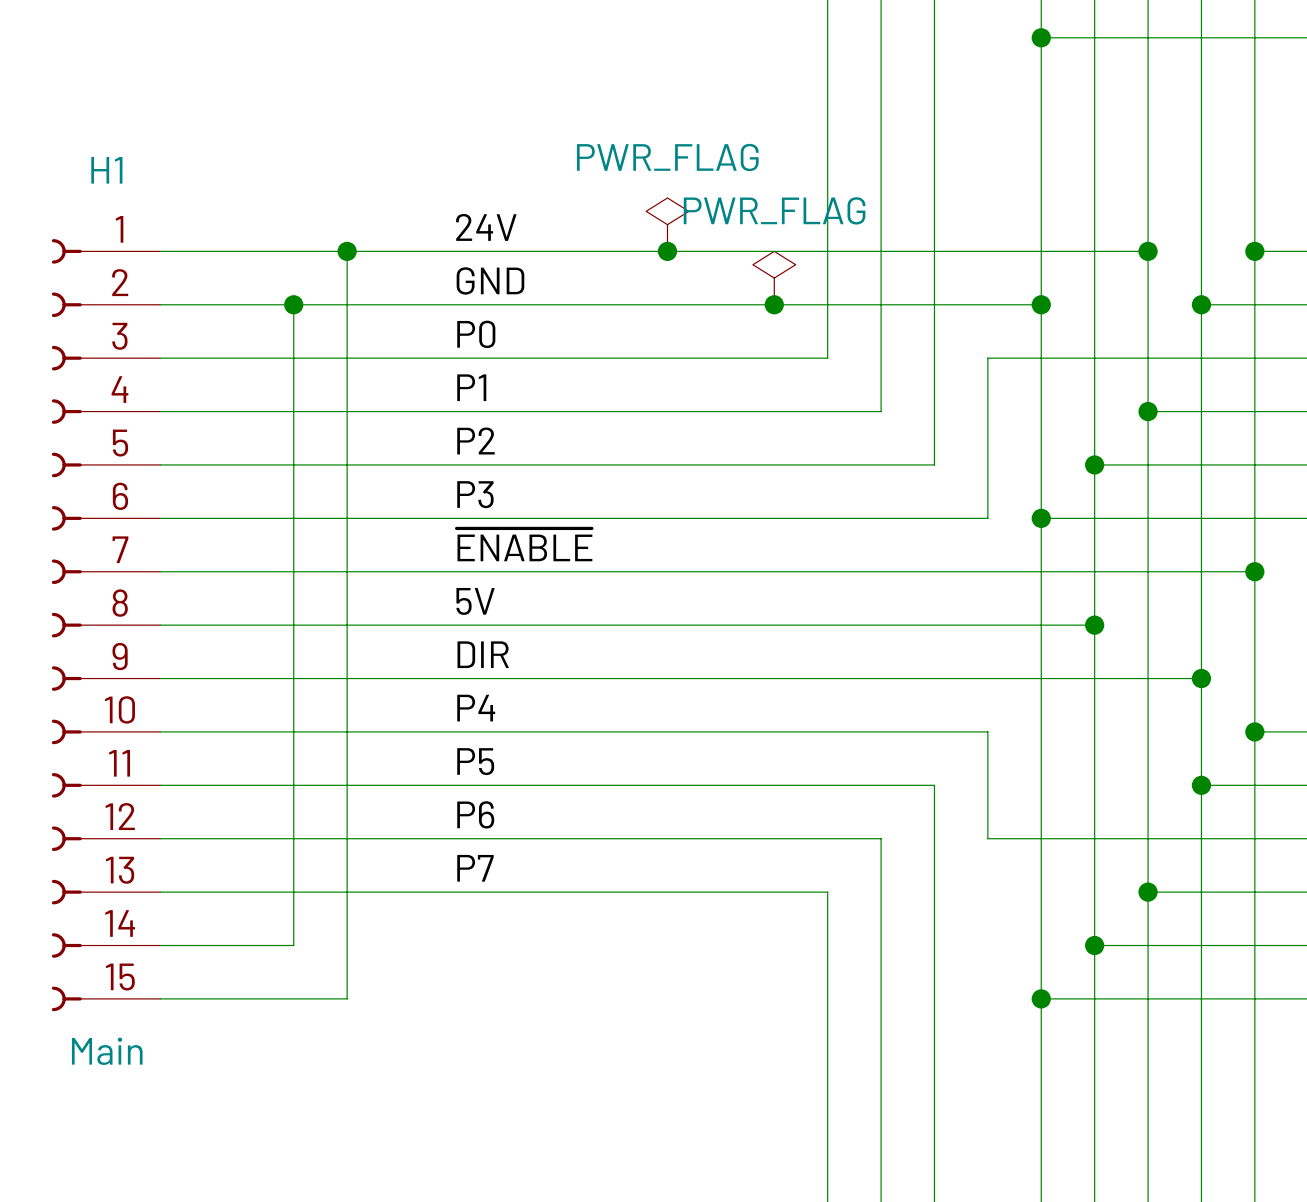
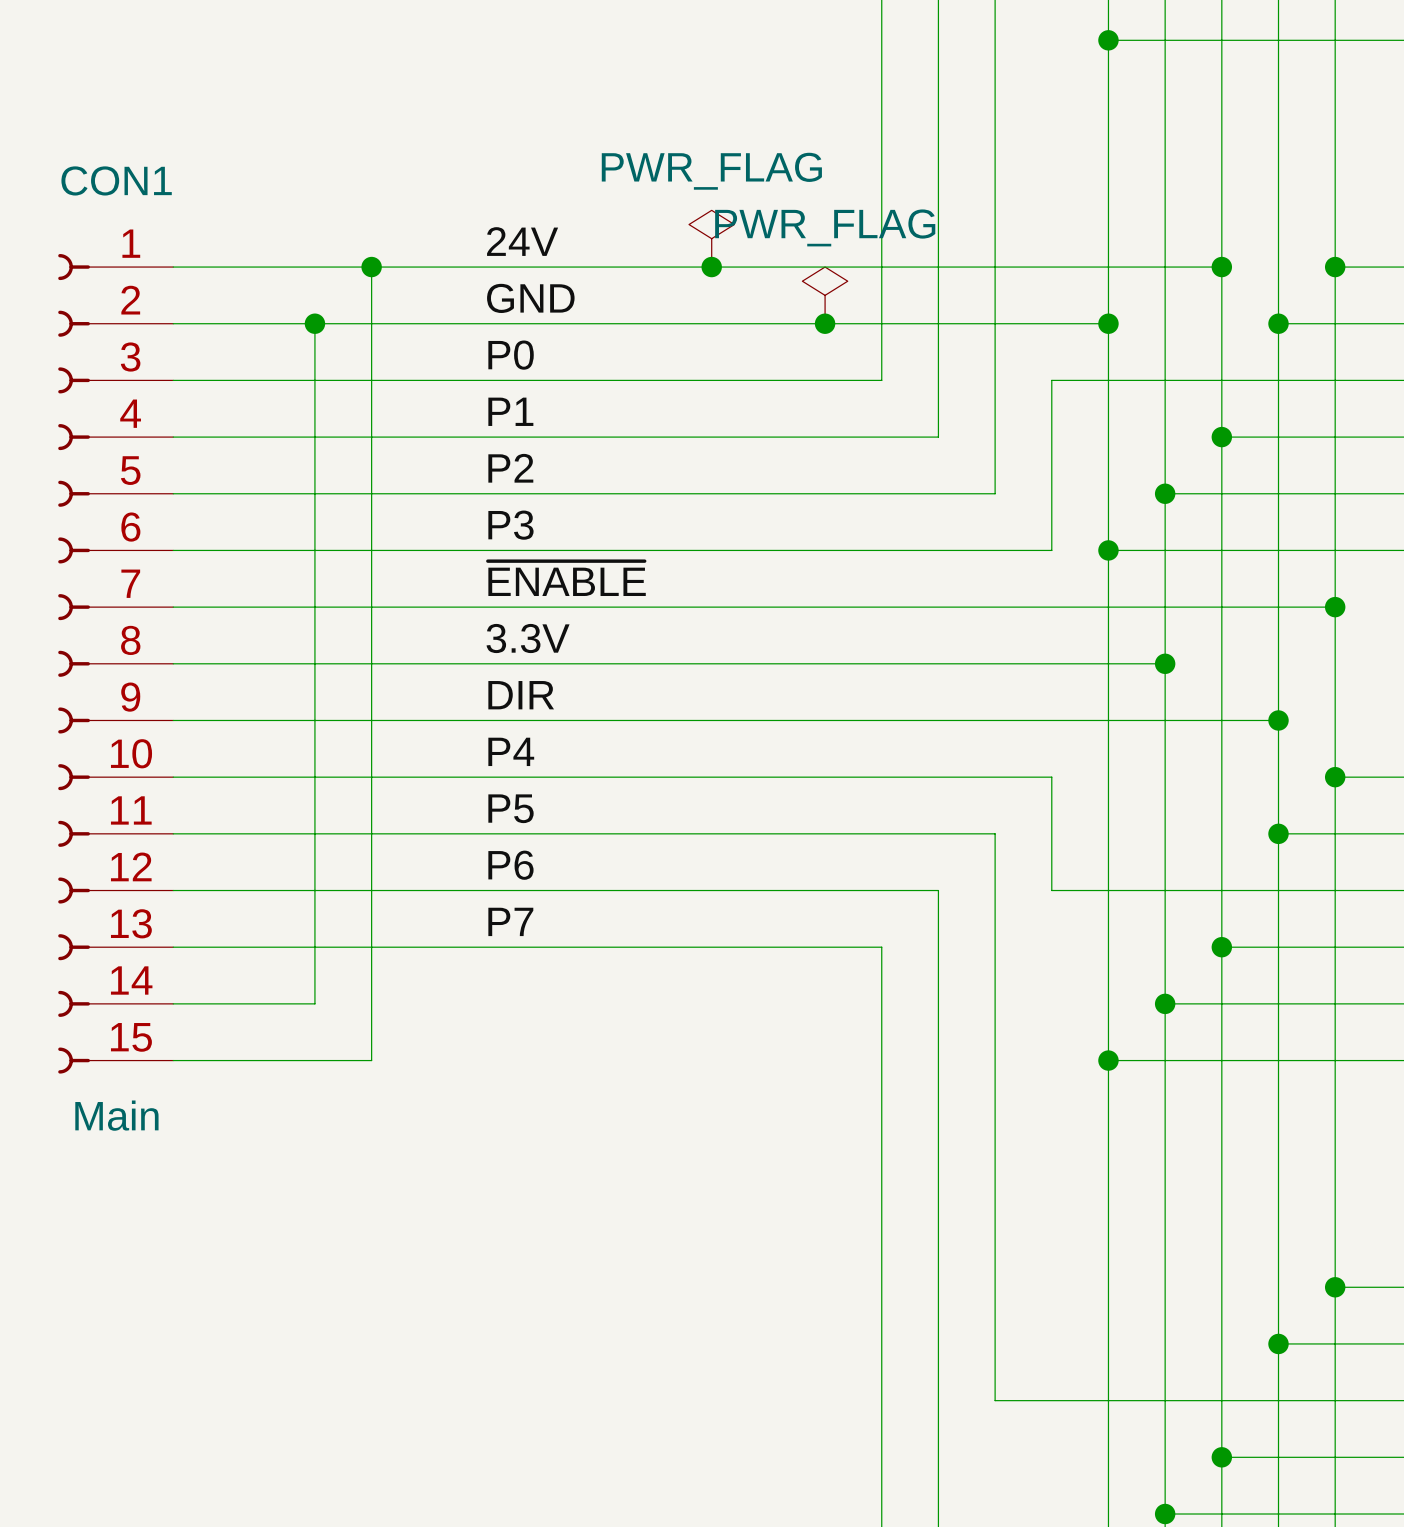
H1 name: H1 (106, 170) -> CON1 (116, 180)
label: 5V (475, 601) -> 3.3V (528, 638)

